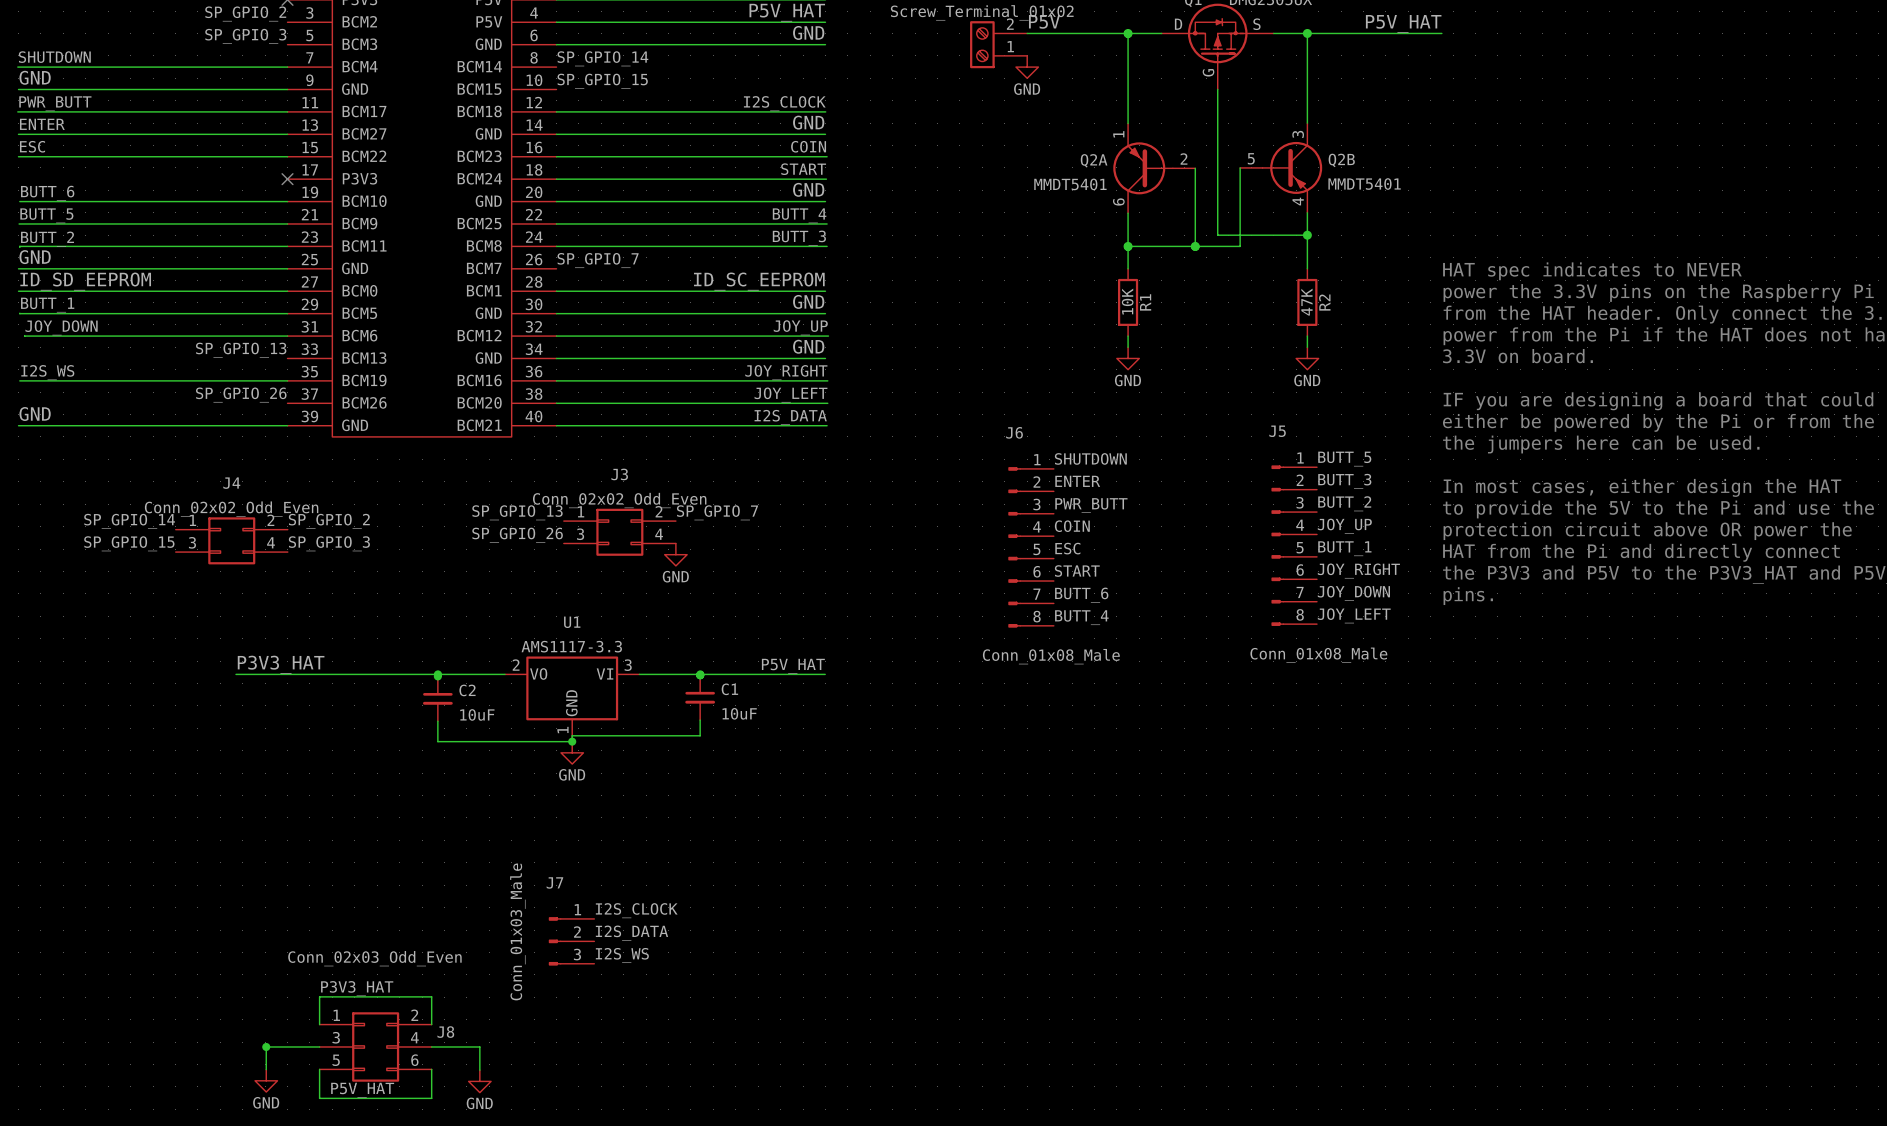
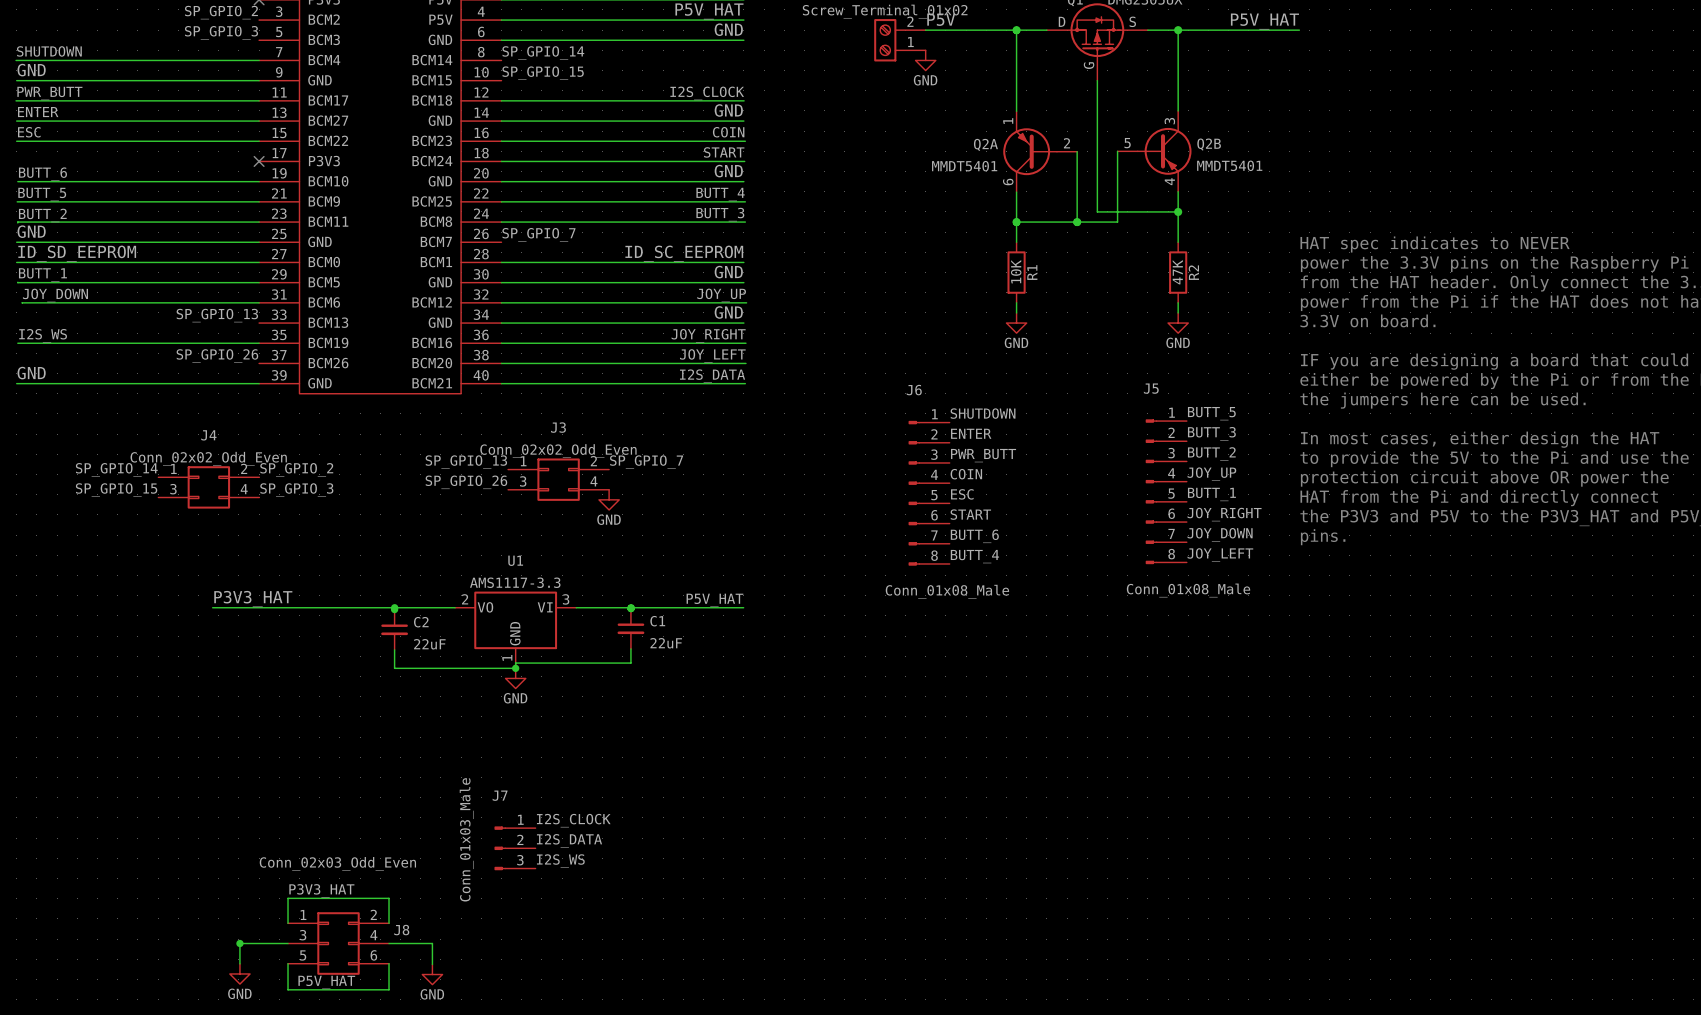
C1 value: 10uF (739, 713) -> 22uF (666, 643)
C2 value: 10uF (477, 714) -> 22uF (429, 644)

